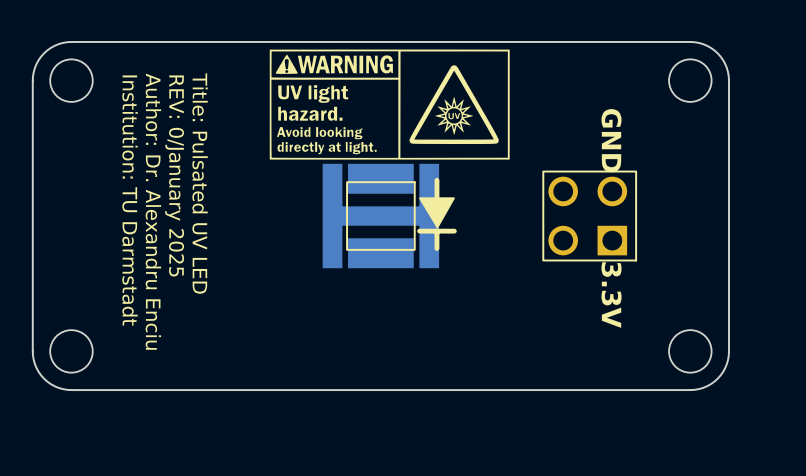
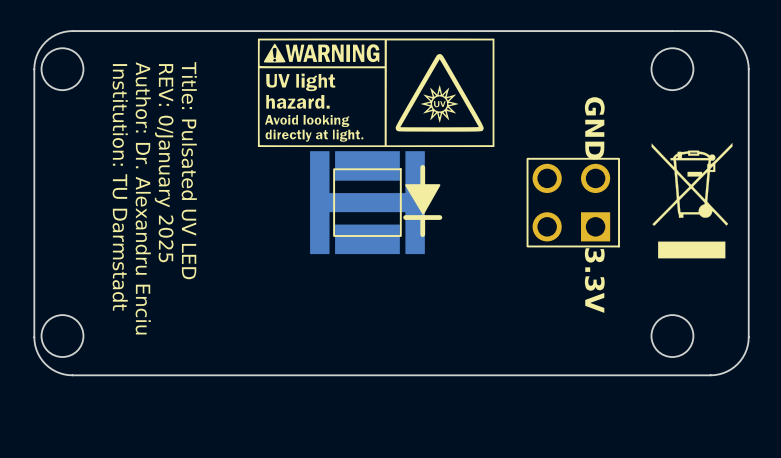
board edge: (690, 41) (707, 45) (717, 53) (725, 63) (728, 76) (728, 355) (723, 371) (710, 384) (690, 390) (71, 390) (54, 386) (44, 378) (36, 368) (33, 355) (32, 80) (36, 63) (47, 50) (62, 42) (81, 41) -> (672, 31) (714, 31) (727, 34) (742, 48) (748, 64) (748, 341) (744, 353) (737, 364) (727, 371) (714, 375) (72, 375) (55, 371) (42, 360) (34, 341) (34, 69) (36, 56) (45, 42) (55, 34) (72, 31)
drawing: none -> [651, 143, 733, 259]

